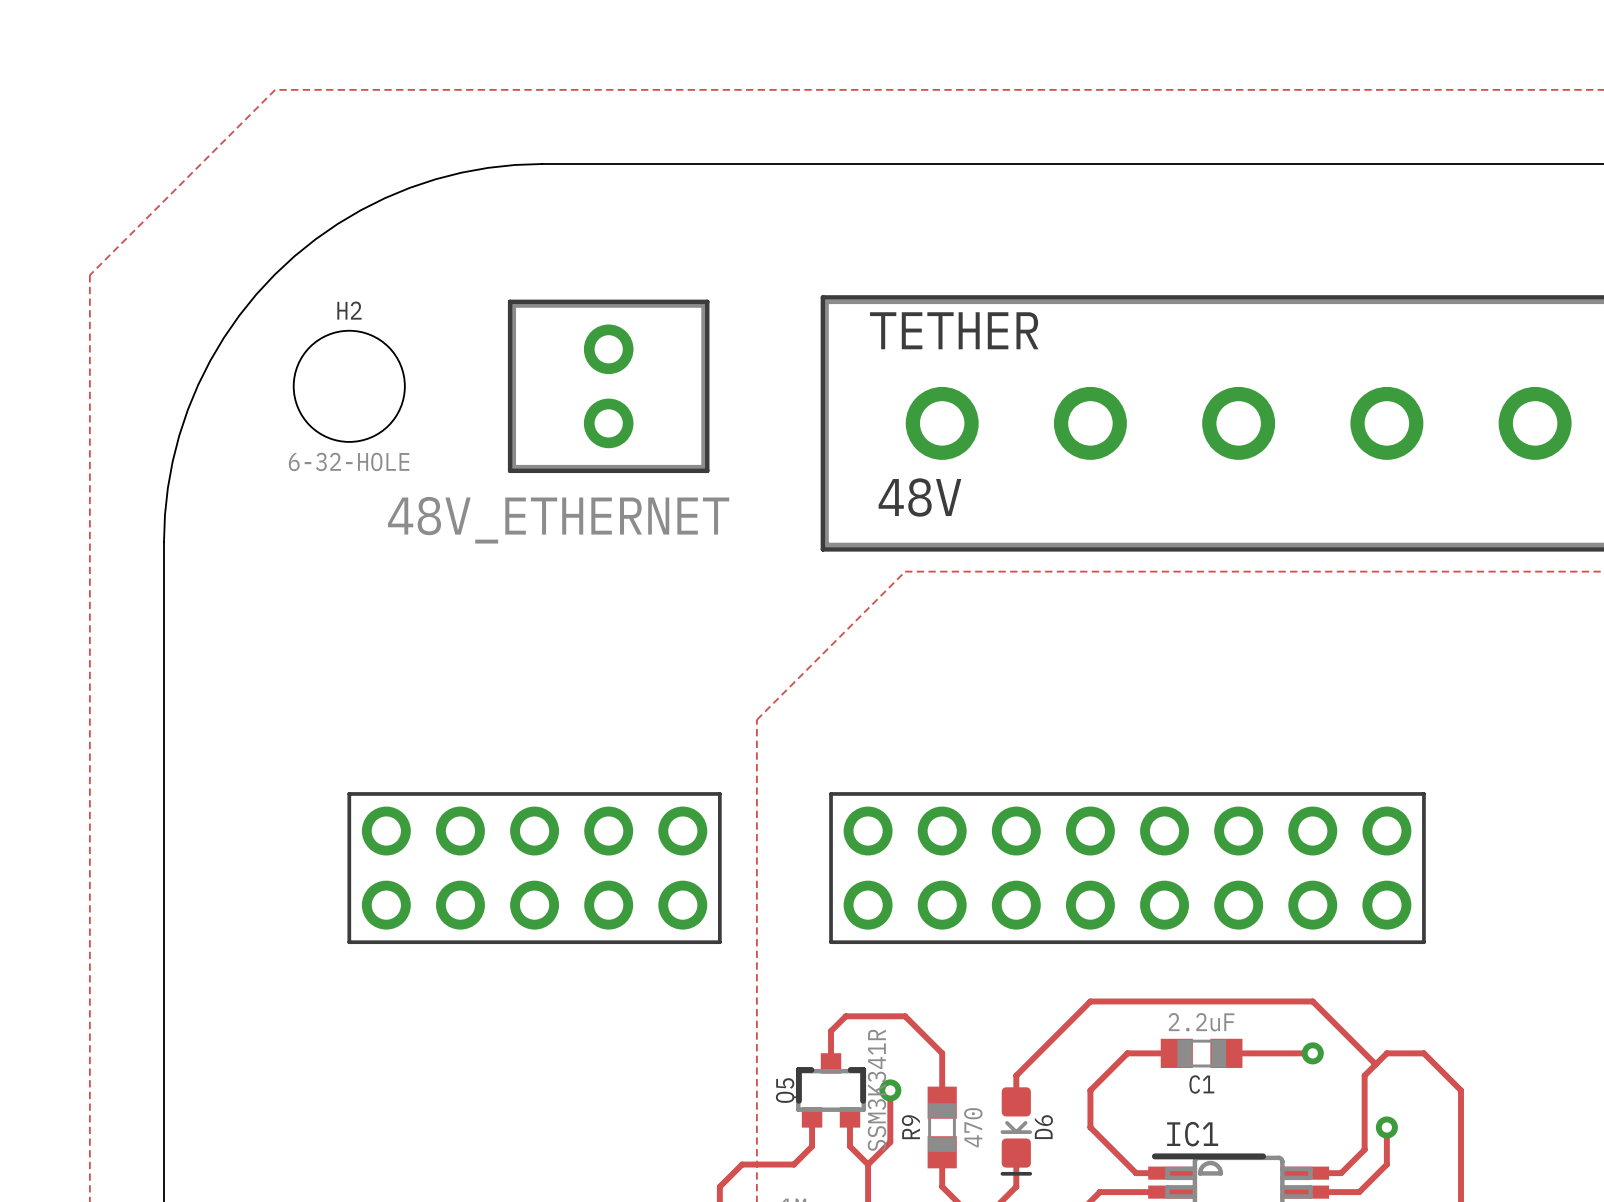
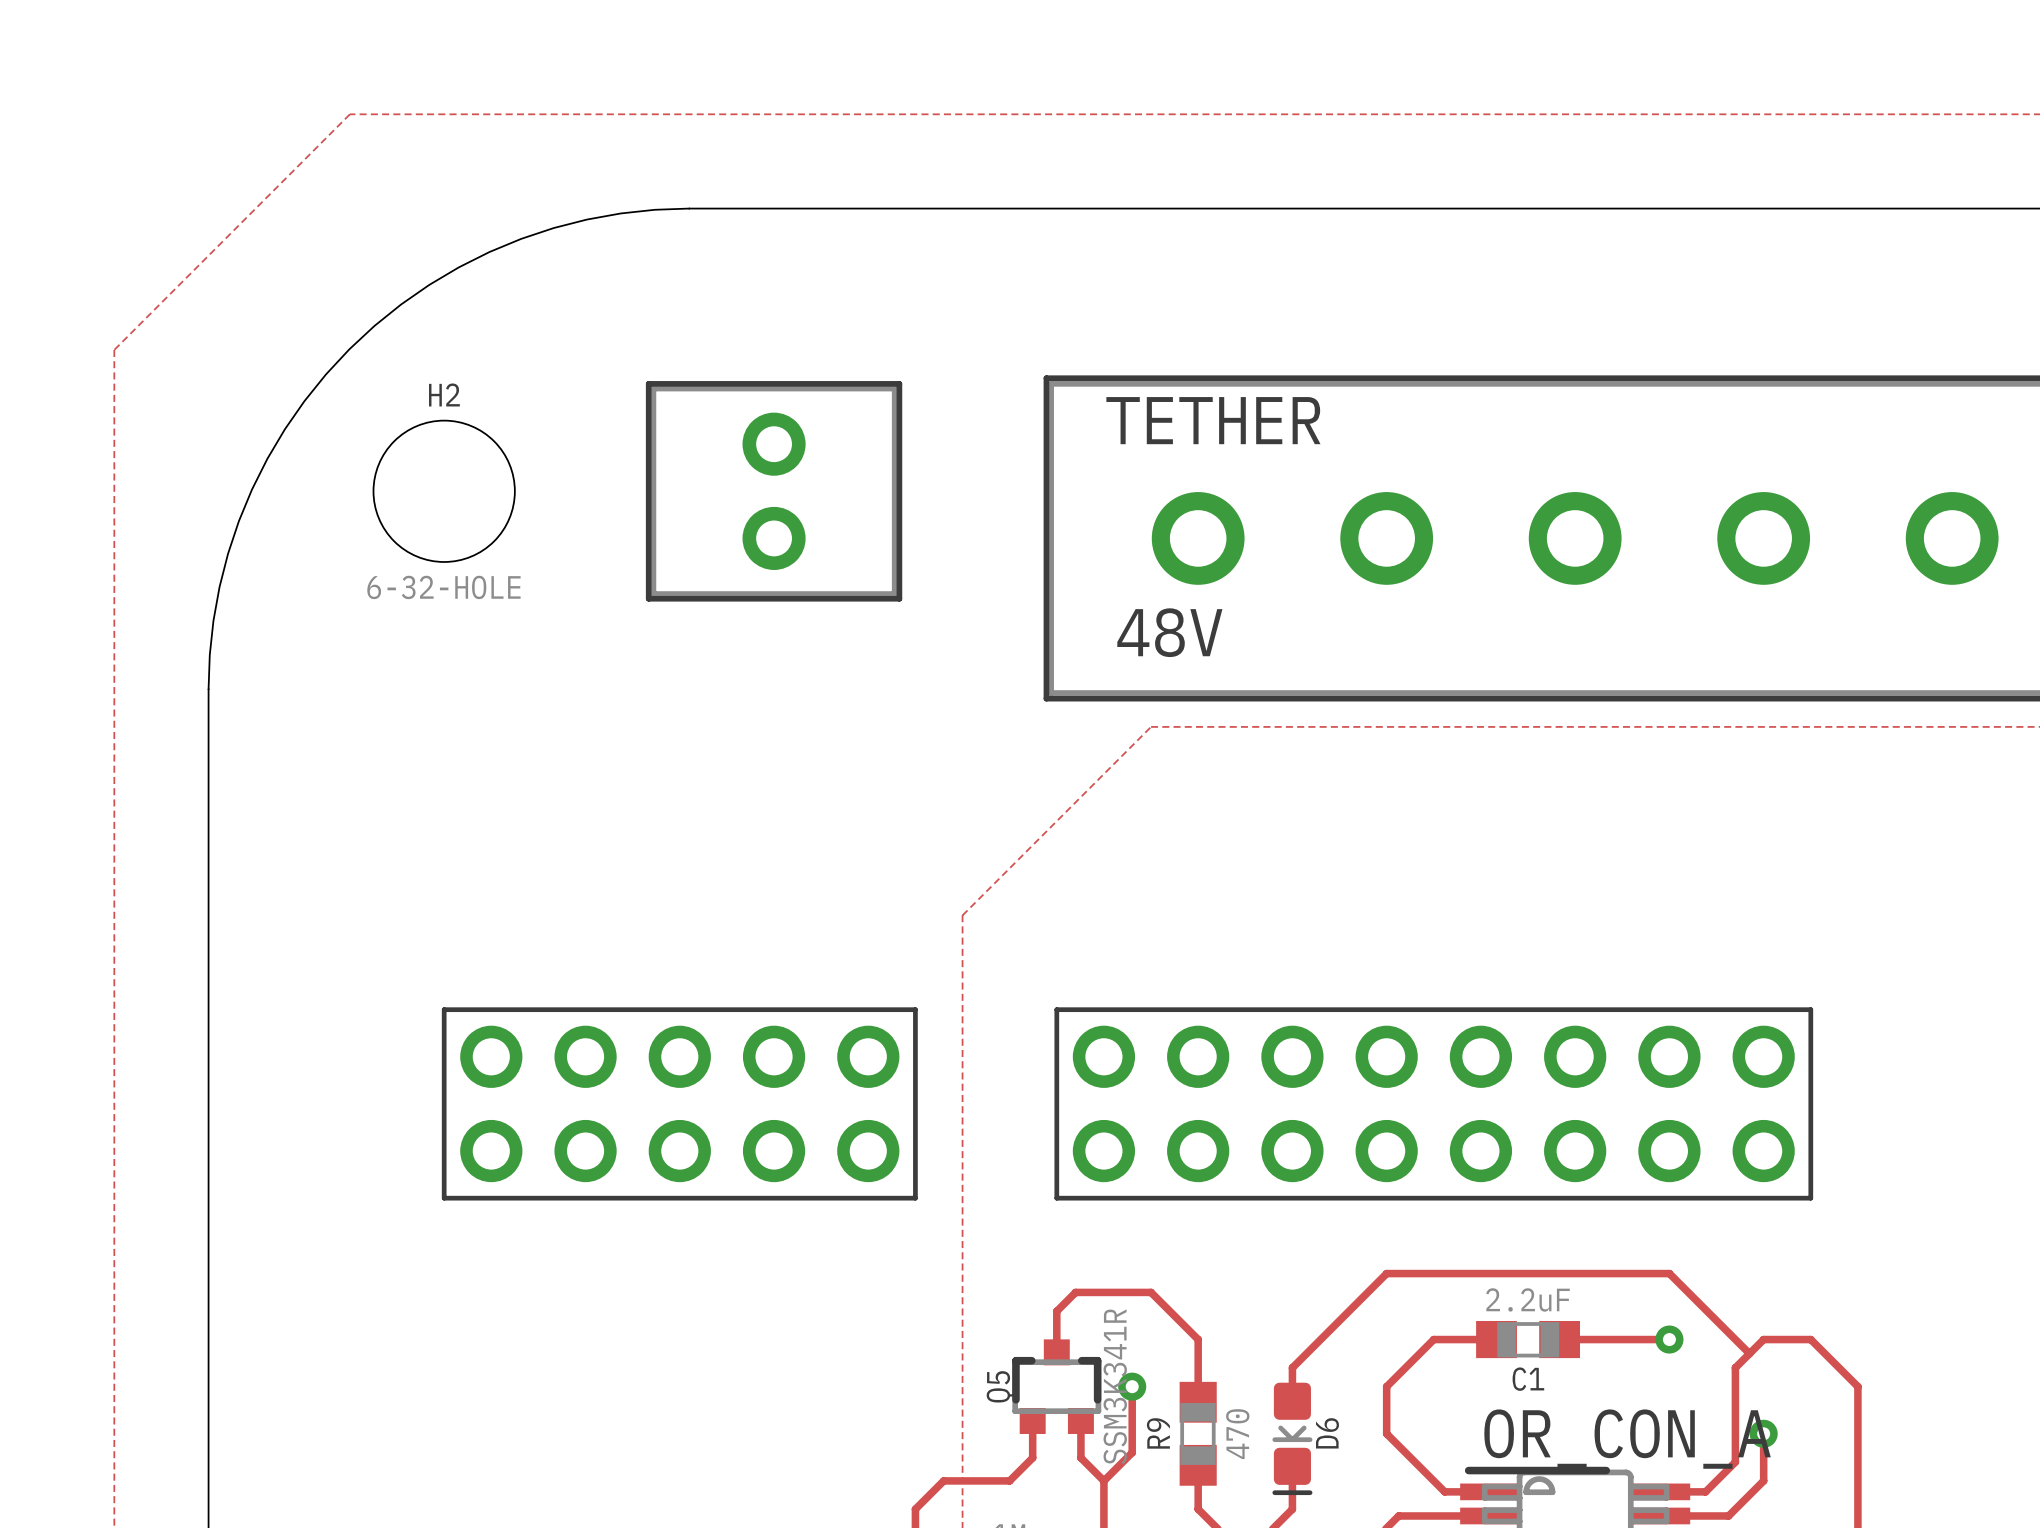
text: 48V_ETHERNET (558, 520) -> none
IC1 name: IC1 (1192, 1134) -> OR_CON_A (1627, 1439)

